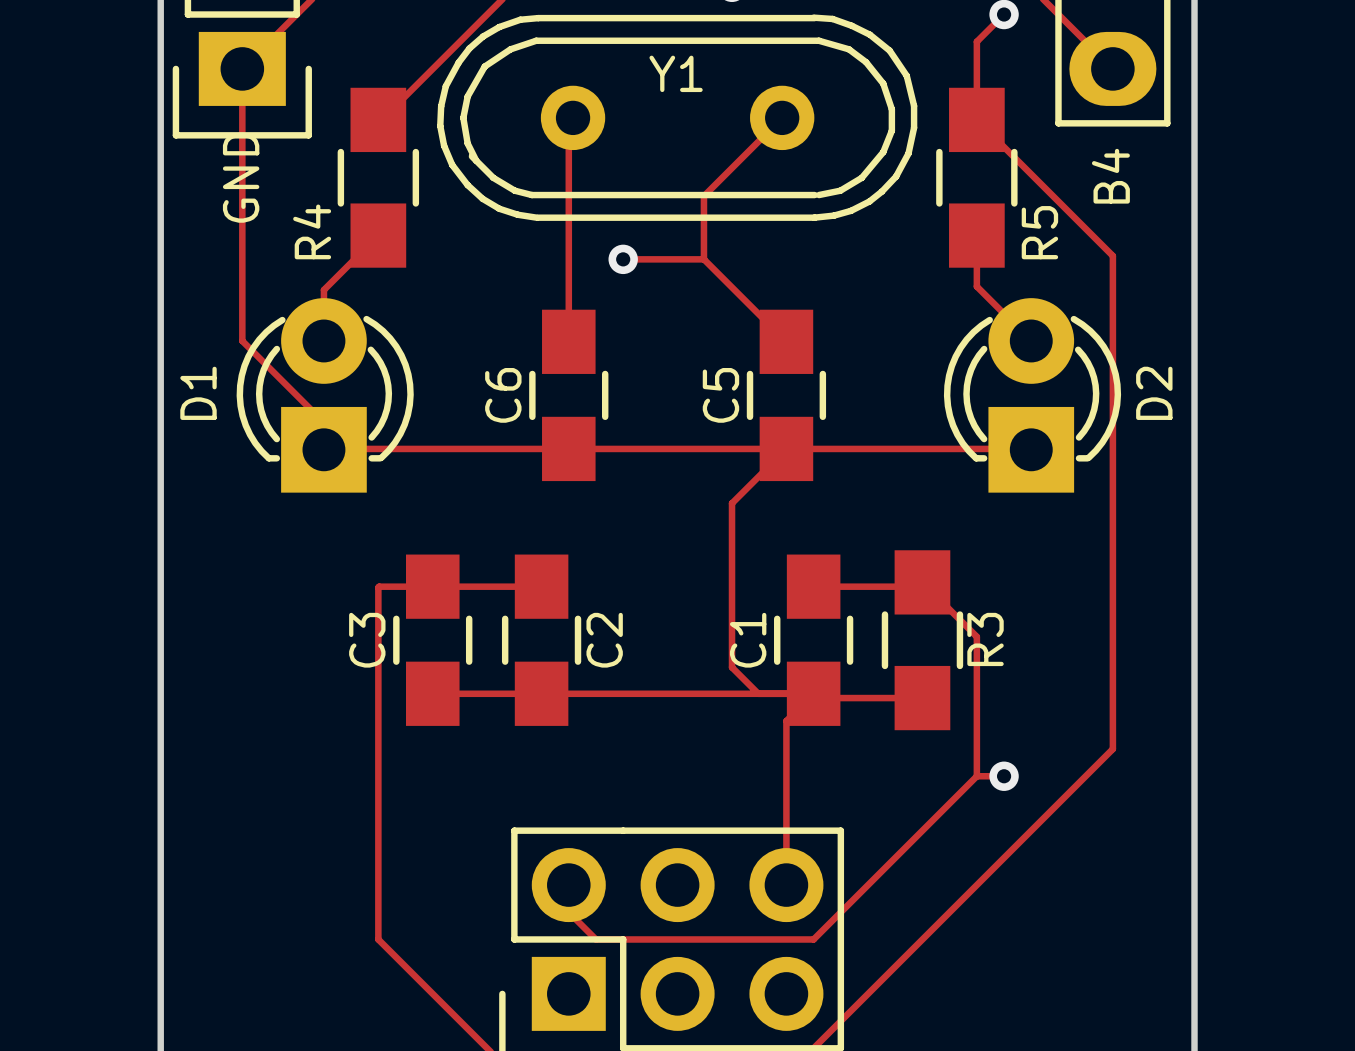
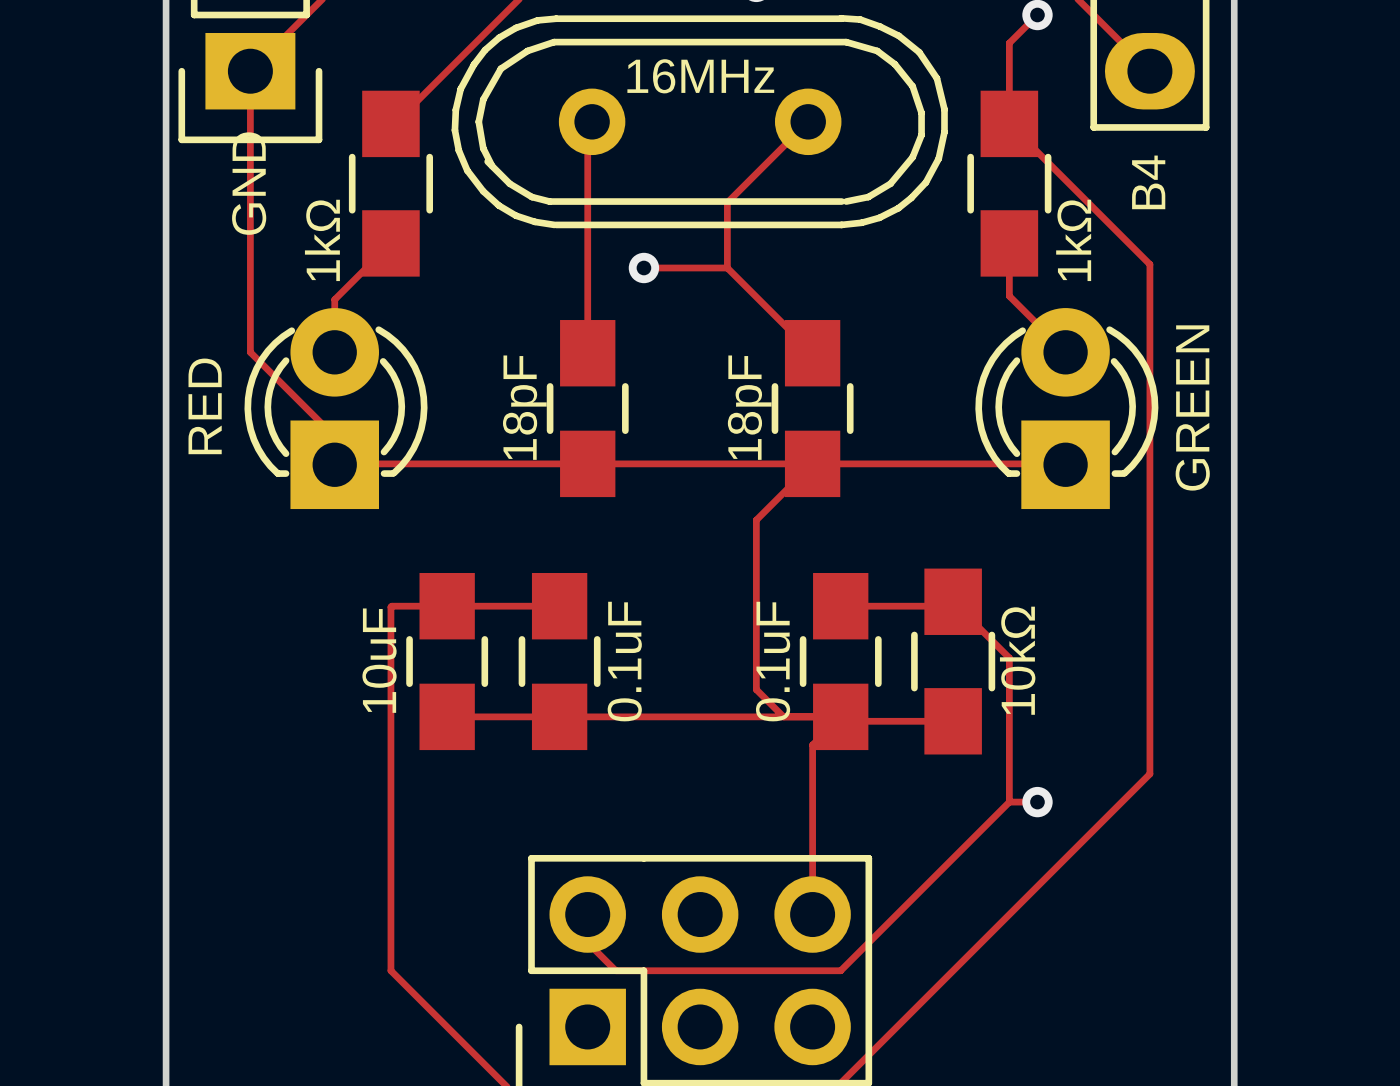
part value: Y1 (676, 73) -> 16MHz (700, 76)
part value: R4 (312, 231) -> 1kΩ (322, 240)
part value: R5 (1039, 232) -> 1kΩ (1073, 240)
part value: D1 (198, 393) -> RED (205, 406)
part value: D2 (1154, 393) -> GREEN (1192, 407)
part value: C6 (503, 395) -> 18pF (524, 407)
part value: C5 (720, 395) -> 18pF (749, 407)
part value: R3 (985, 639) -> 10kΩ (1017, 660)
part value: C3 (367, 640) -> 10uF (379, 660)
part value: C2 (604, 640) -> 0.1uF (624, 661)
part value: C1 (748, 640) -> 0.1uF (773, 661)

